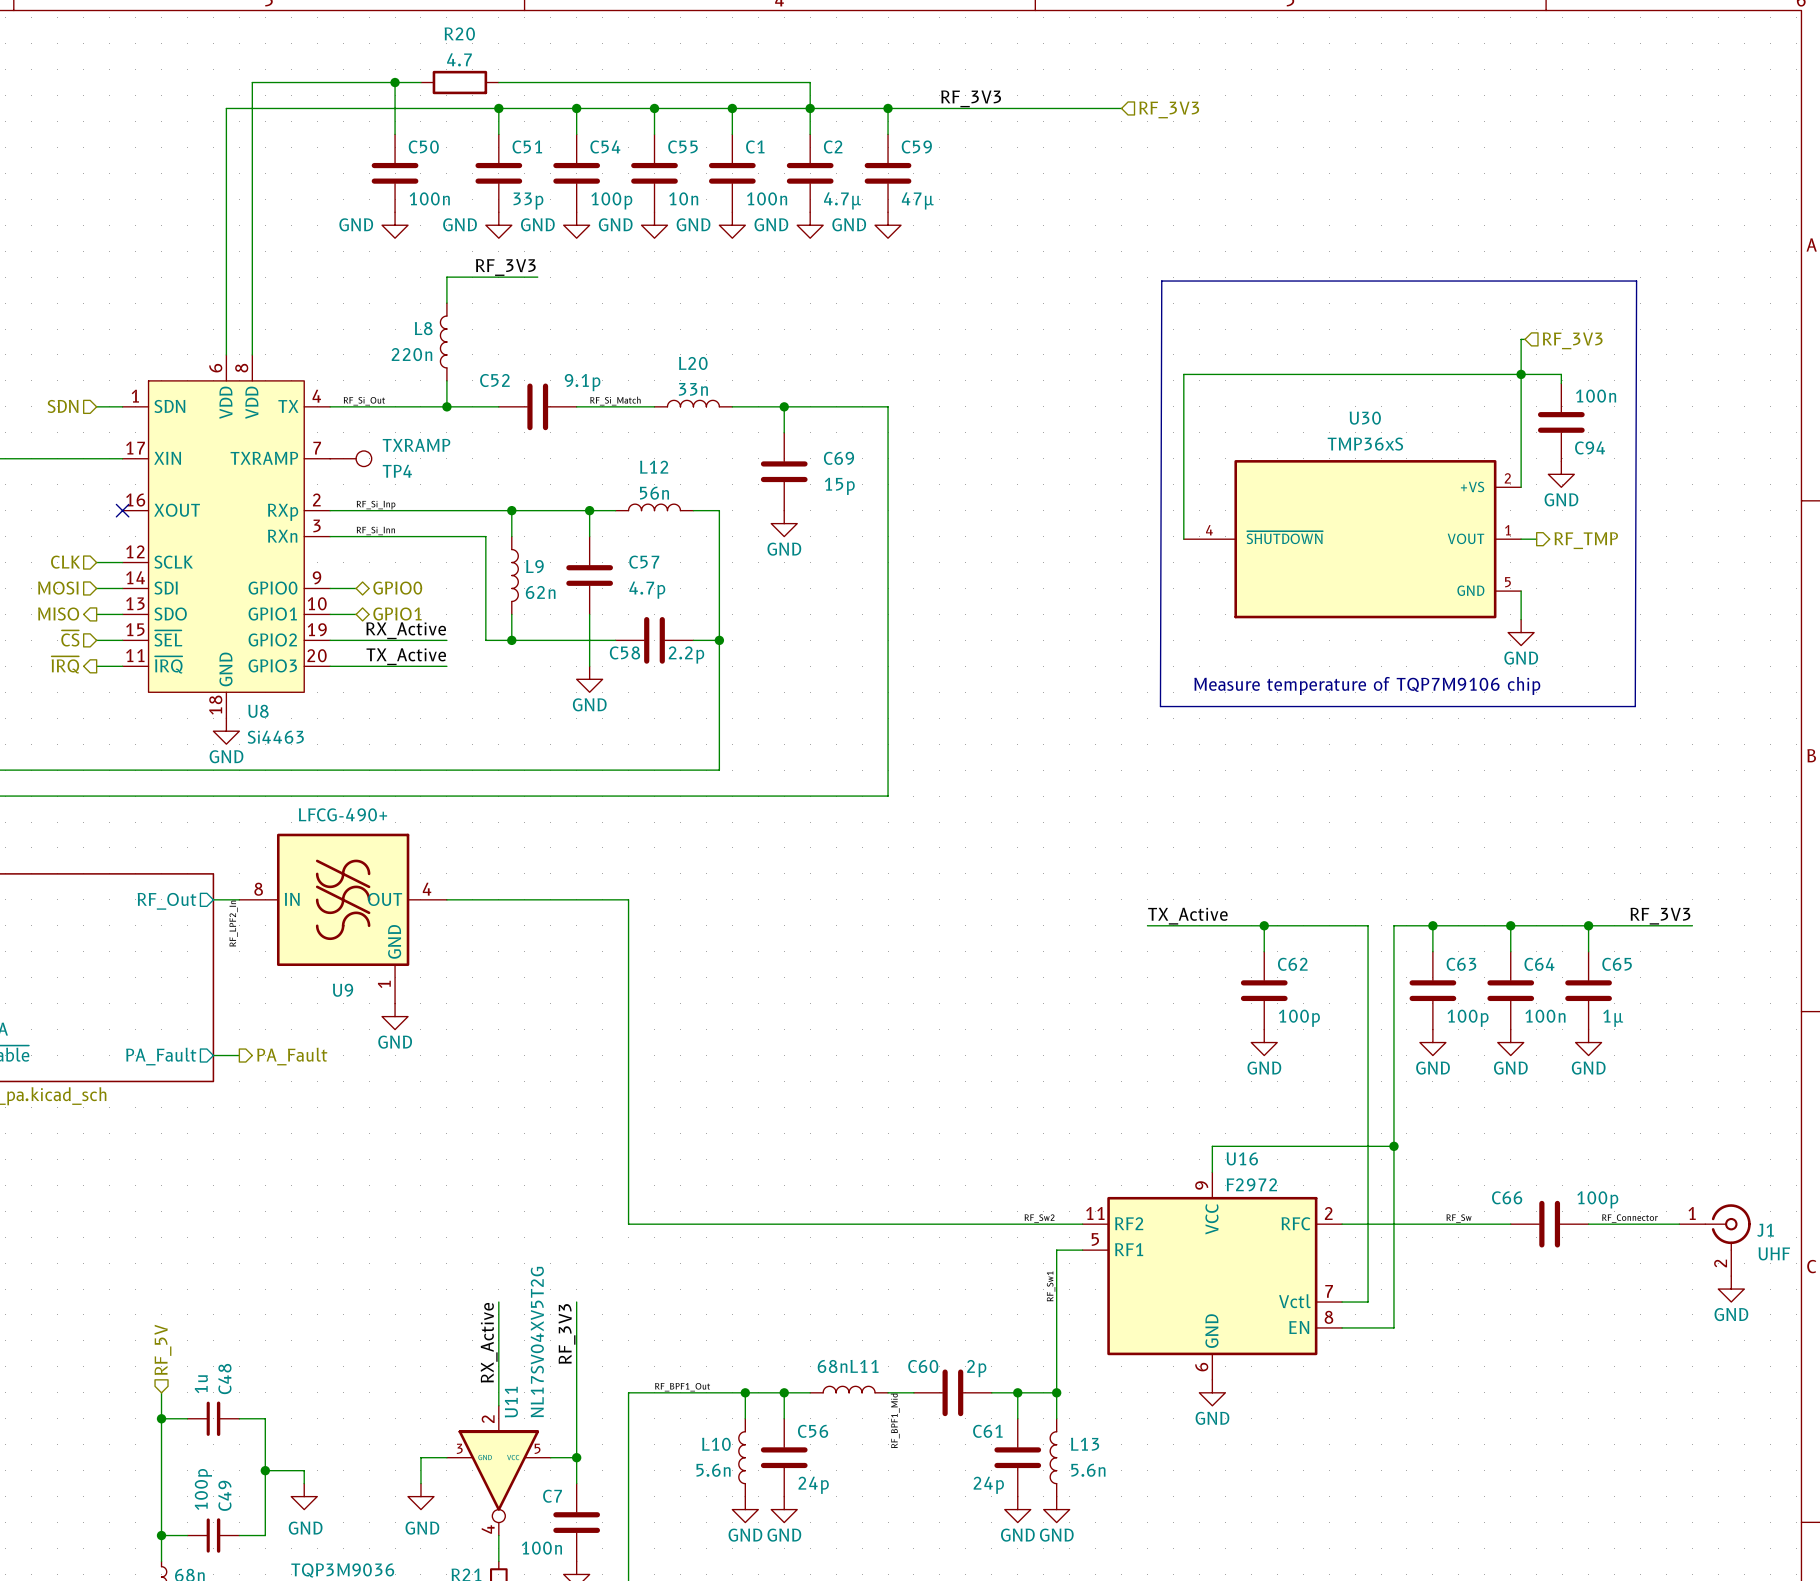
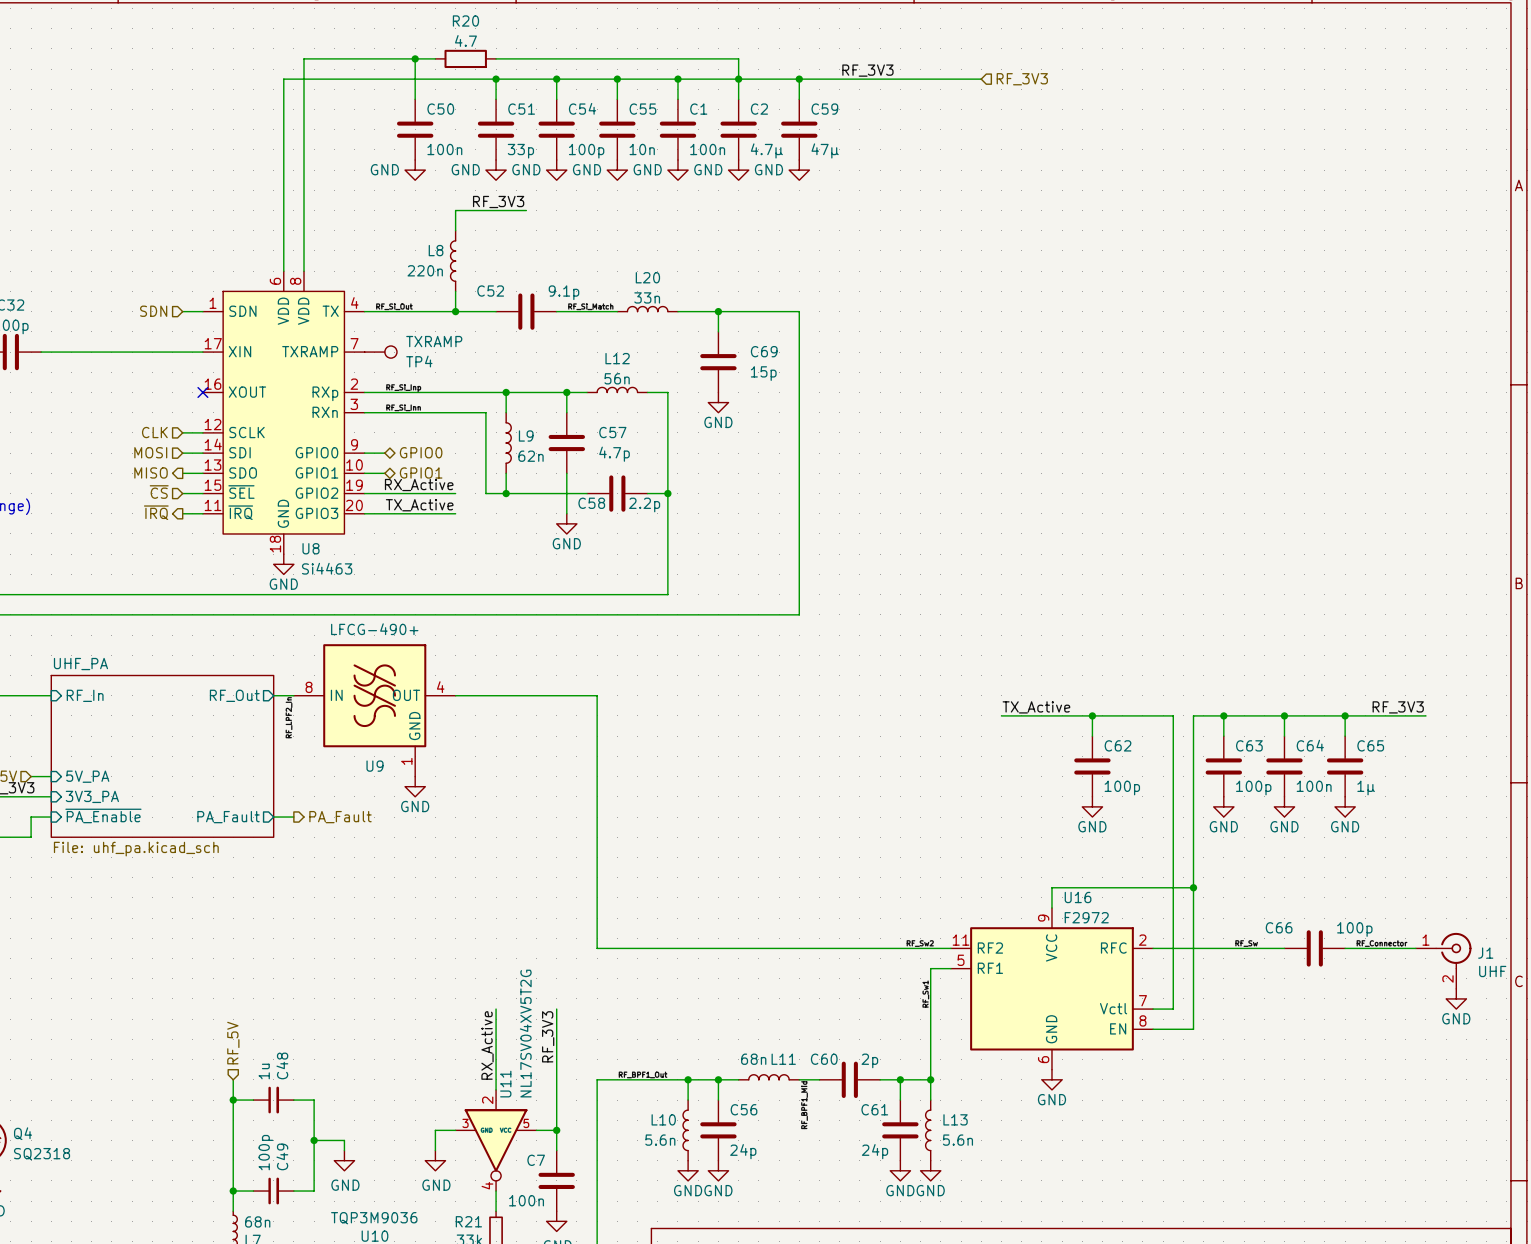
line: (1161, 281) (1160, 706) (1635, 706) (1636, 281) (1161, 281) -> none
wire: (1525, 339) (1521, 339) (1521, 487) -> none
hierarchical label: RF_3V3 (1572, 340) -> none
junction: (1521, 374) -> none
wire: (1561, 383) (1561, 374) (1183, 374) (1183, 539) -> none
C94: 100n (1561, 422) -> none
power symbol: GND (1561, 474) -> none
U30: TMP36xS (1352, 539) -> none
wire: (1521, 539) (1536, 539) -> none
hierarchical label: RF_TMP (1586, 540) -> none
wire: (1521, 591) (1521, 619) -> none
power symbol: GND (1521, 632) -> none
text: Measure temperature of TQP7M9106 chip (1367, 685) -> none

